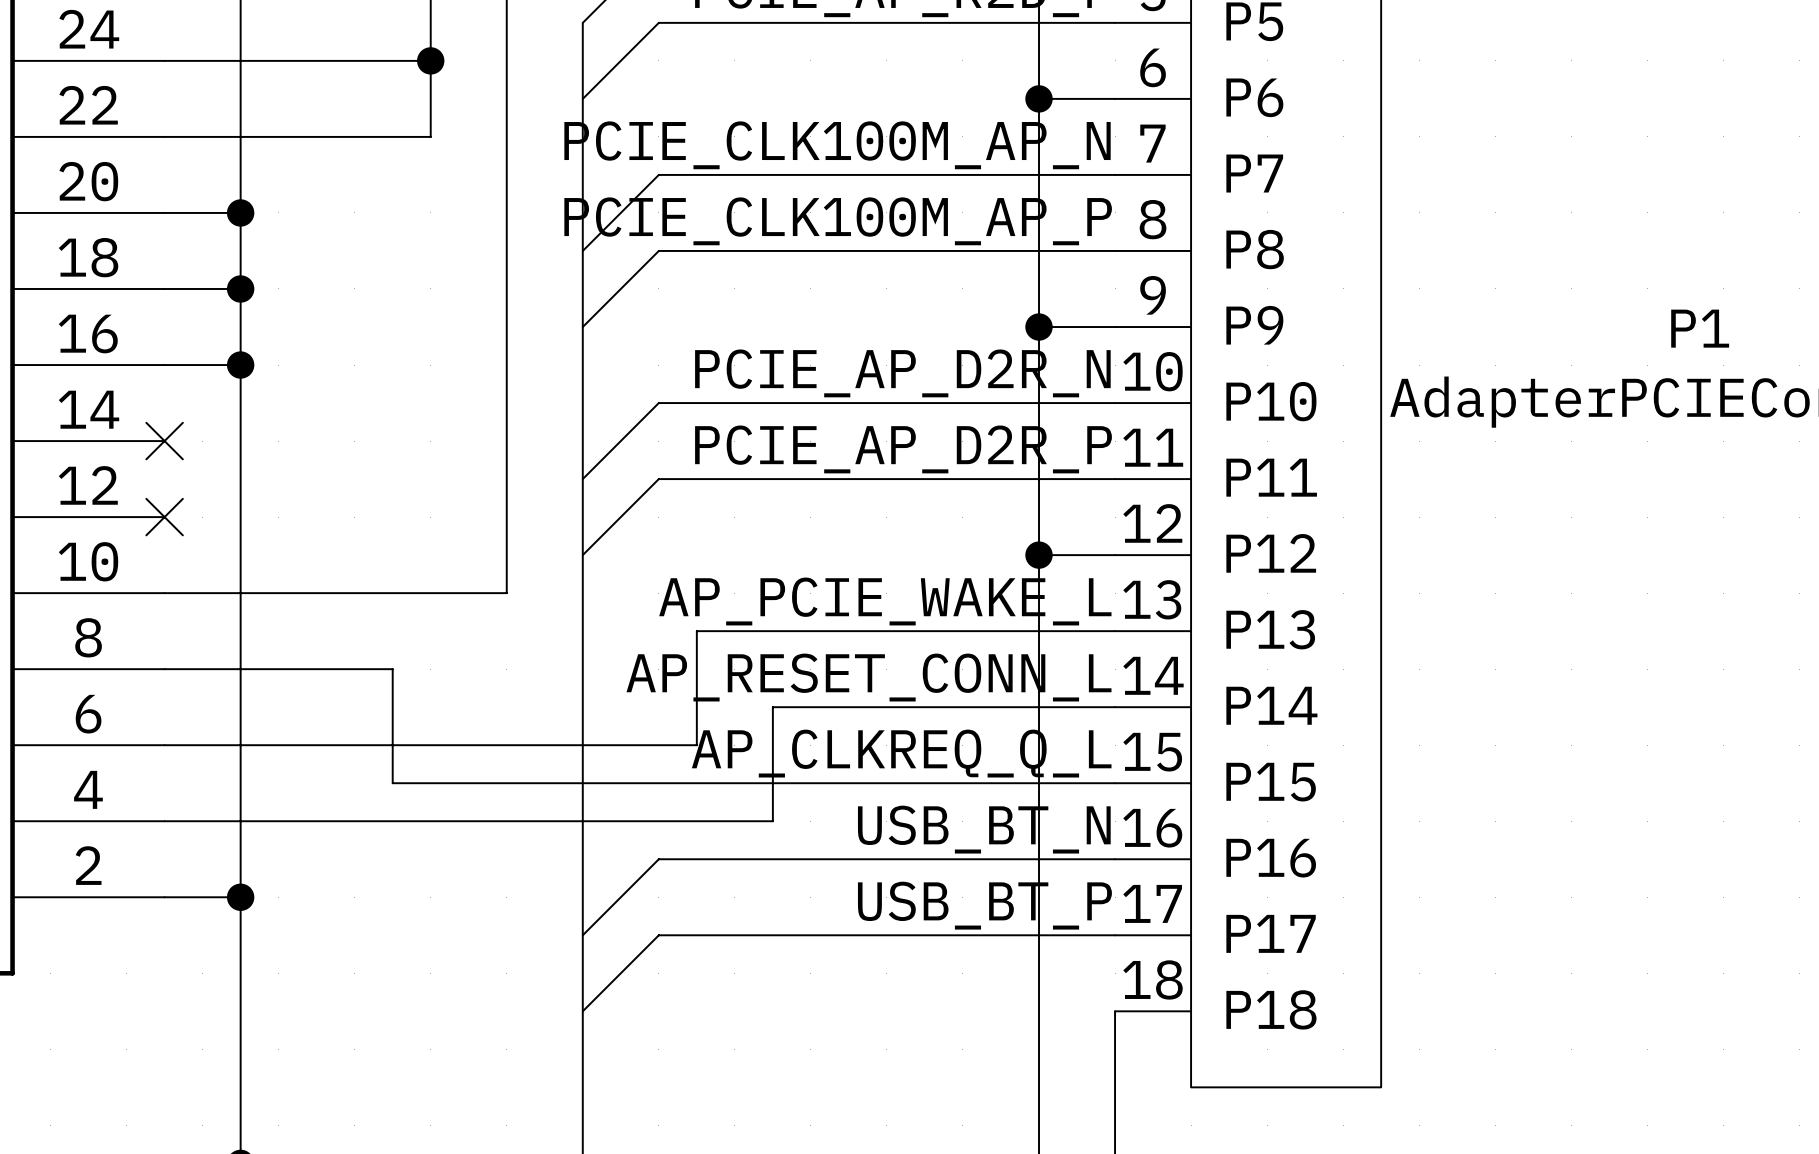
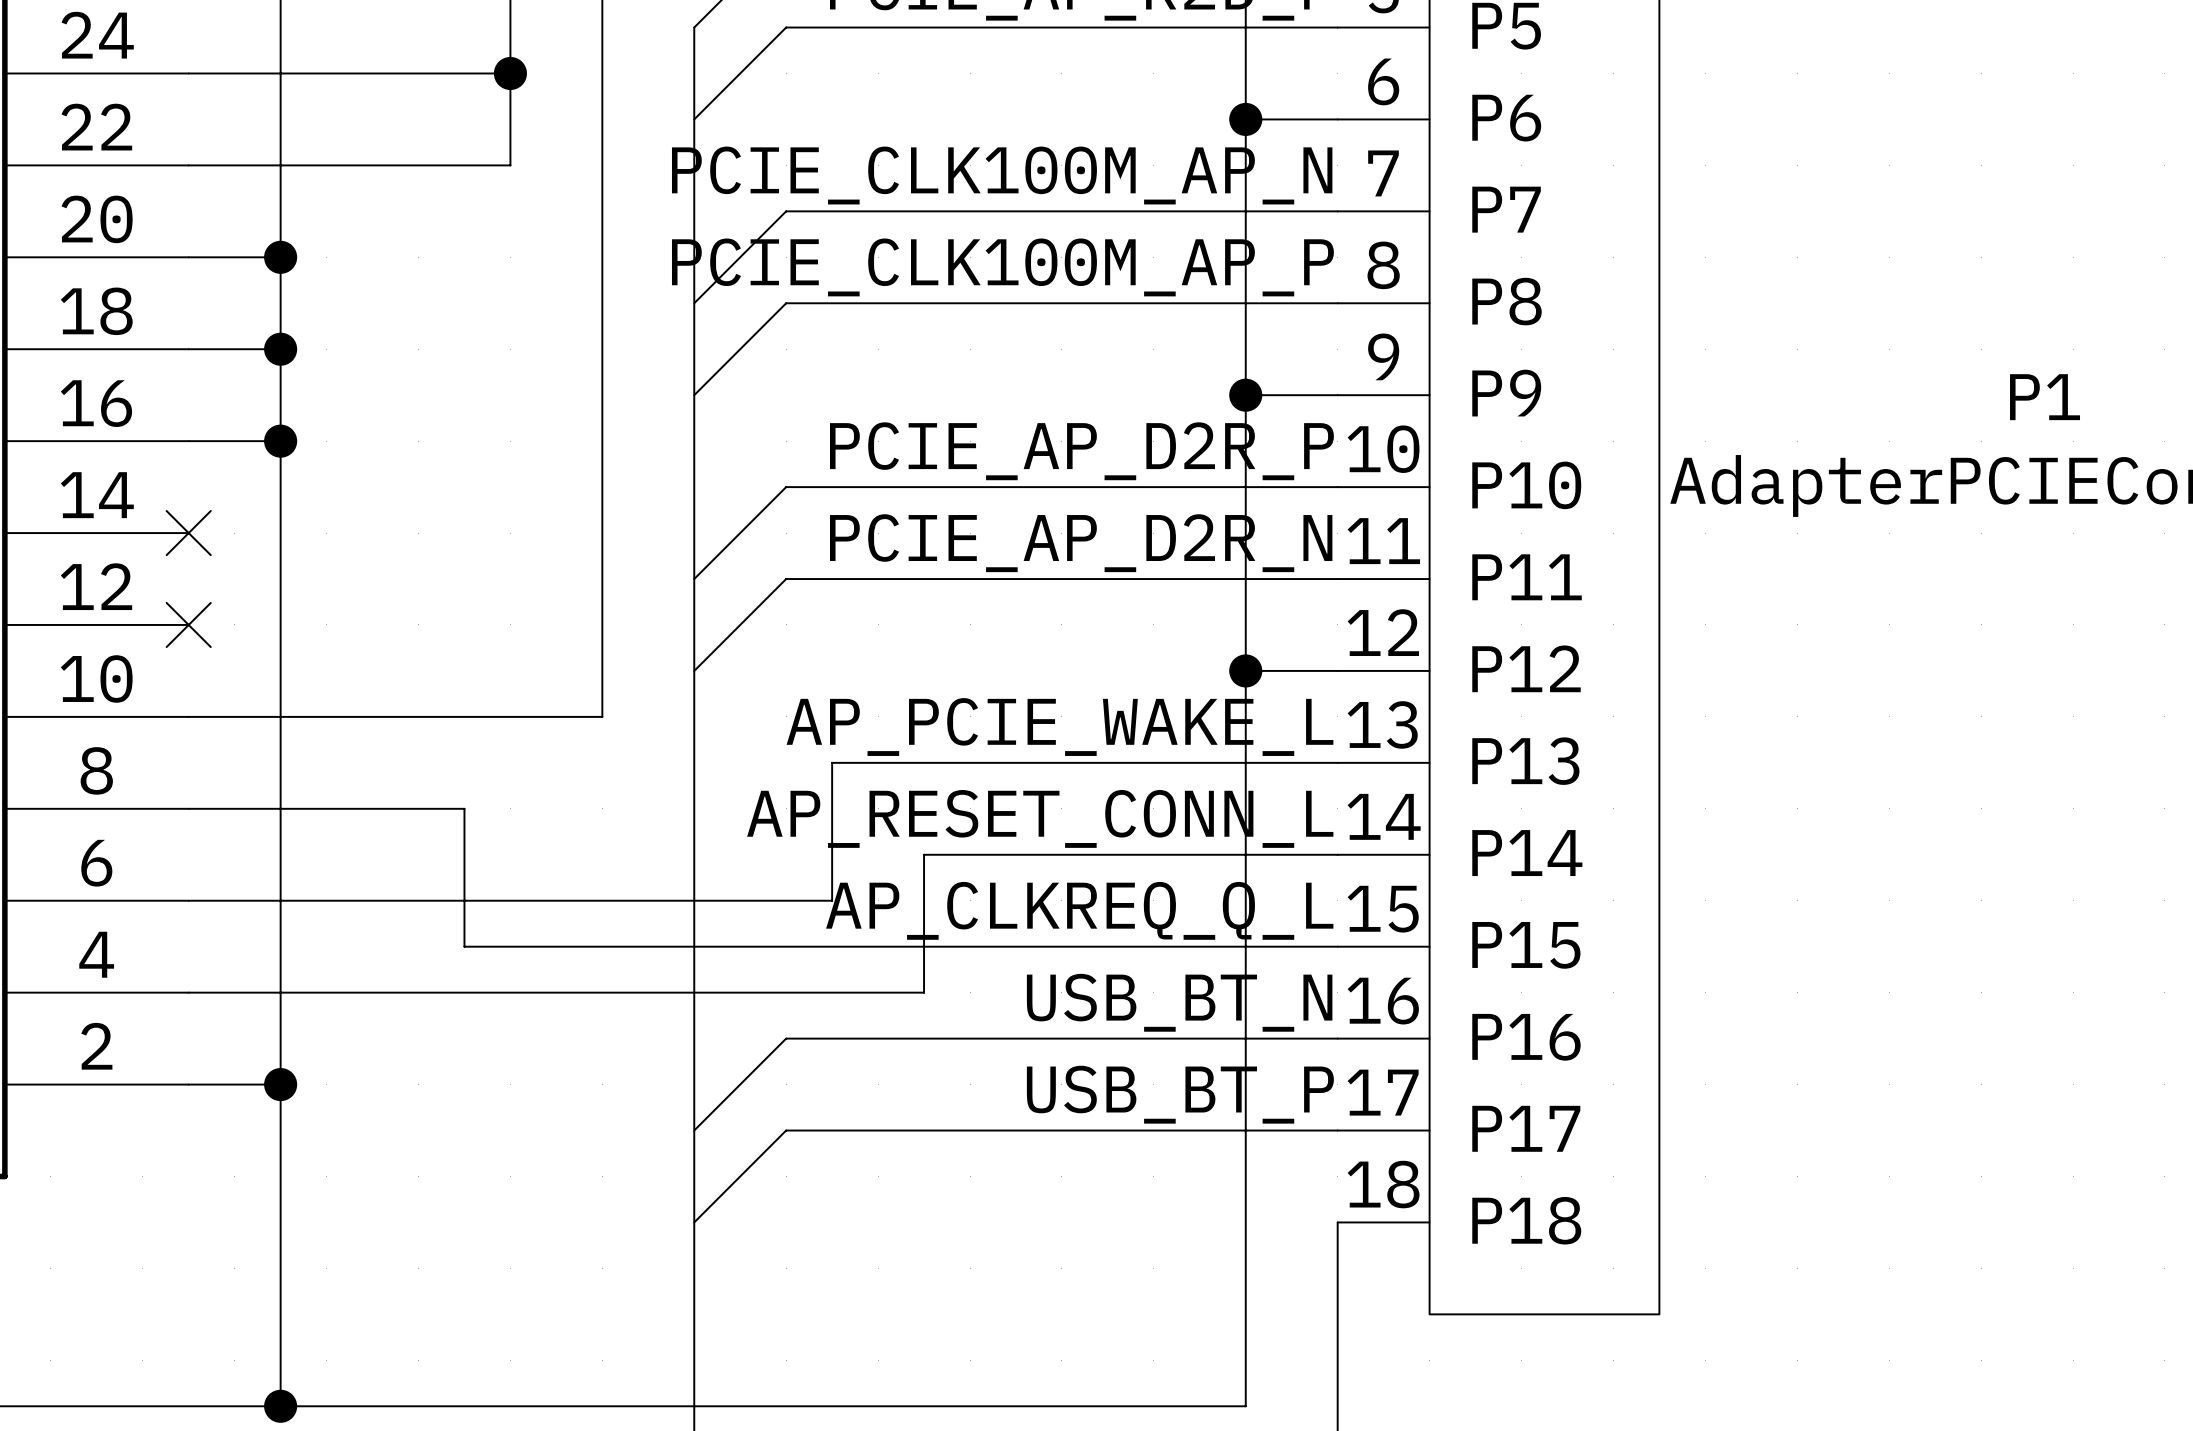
label: PCIE_AP_D2R_N (902, 373) -> PCIE_AP_D2R_P (1081, 451)
label: PCIE_AP_D2R_P (903, 449) -> PCIE_AP_D2R_N (1081, 543)

